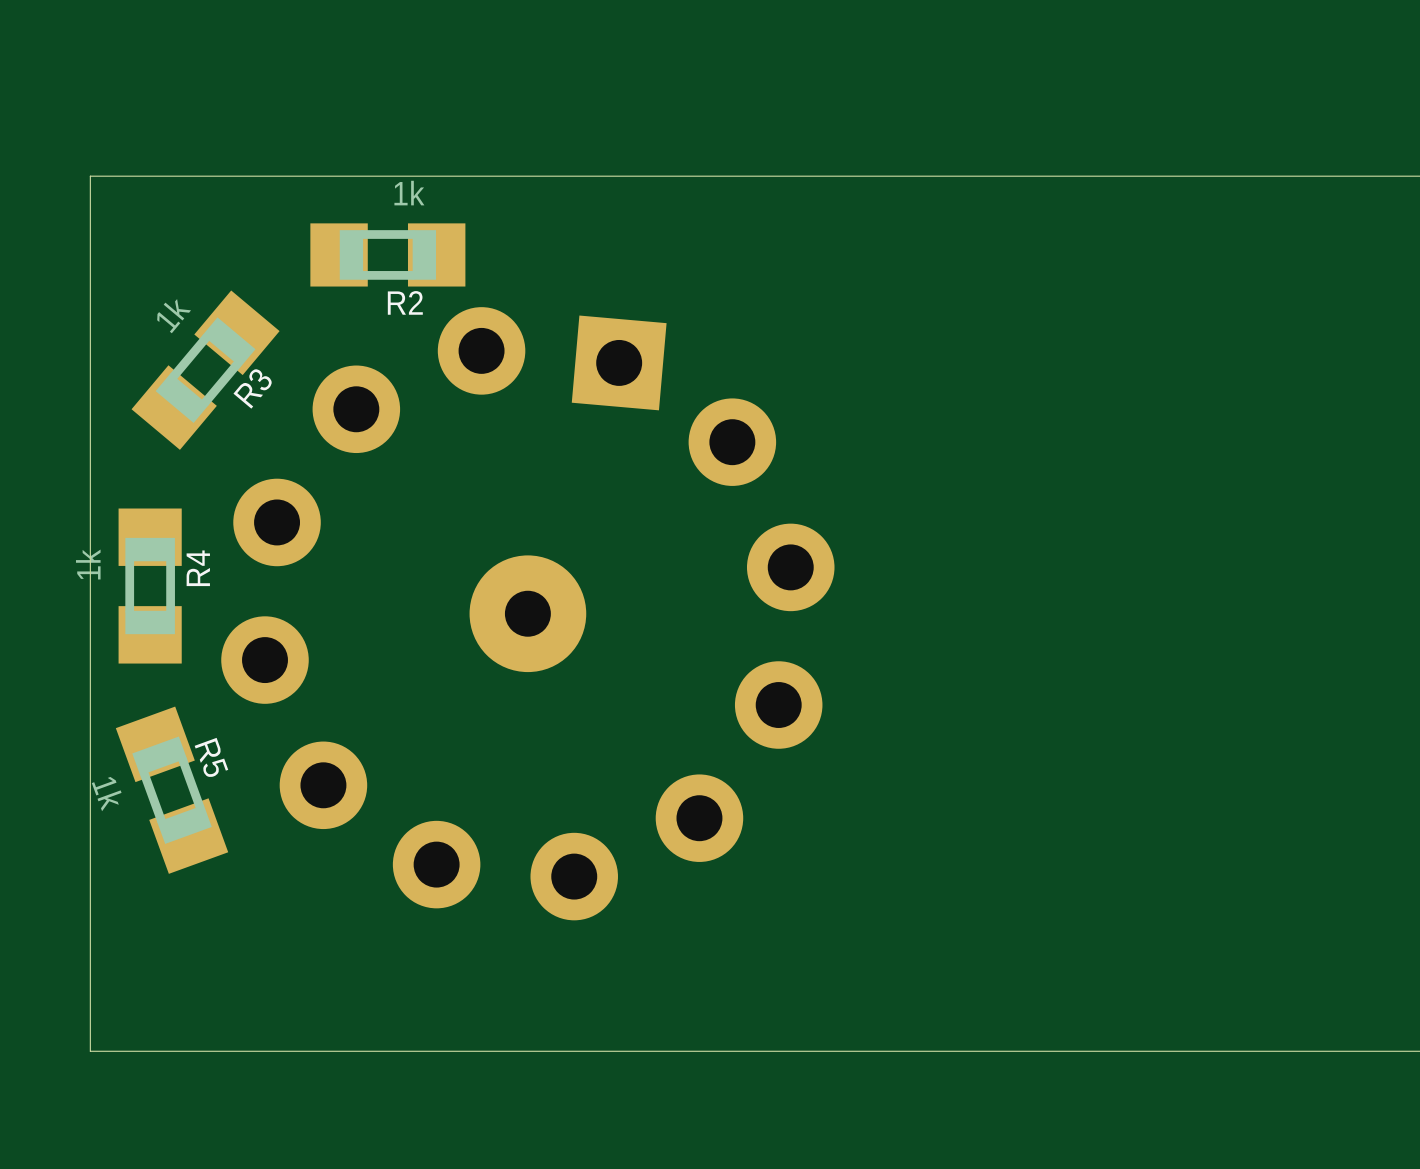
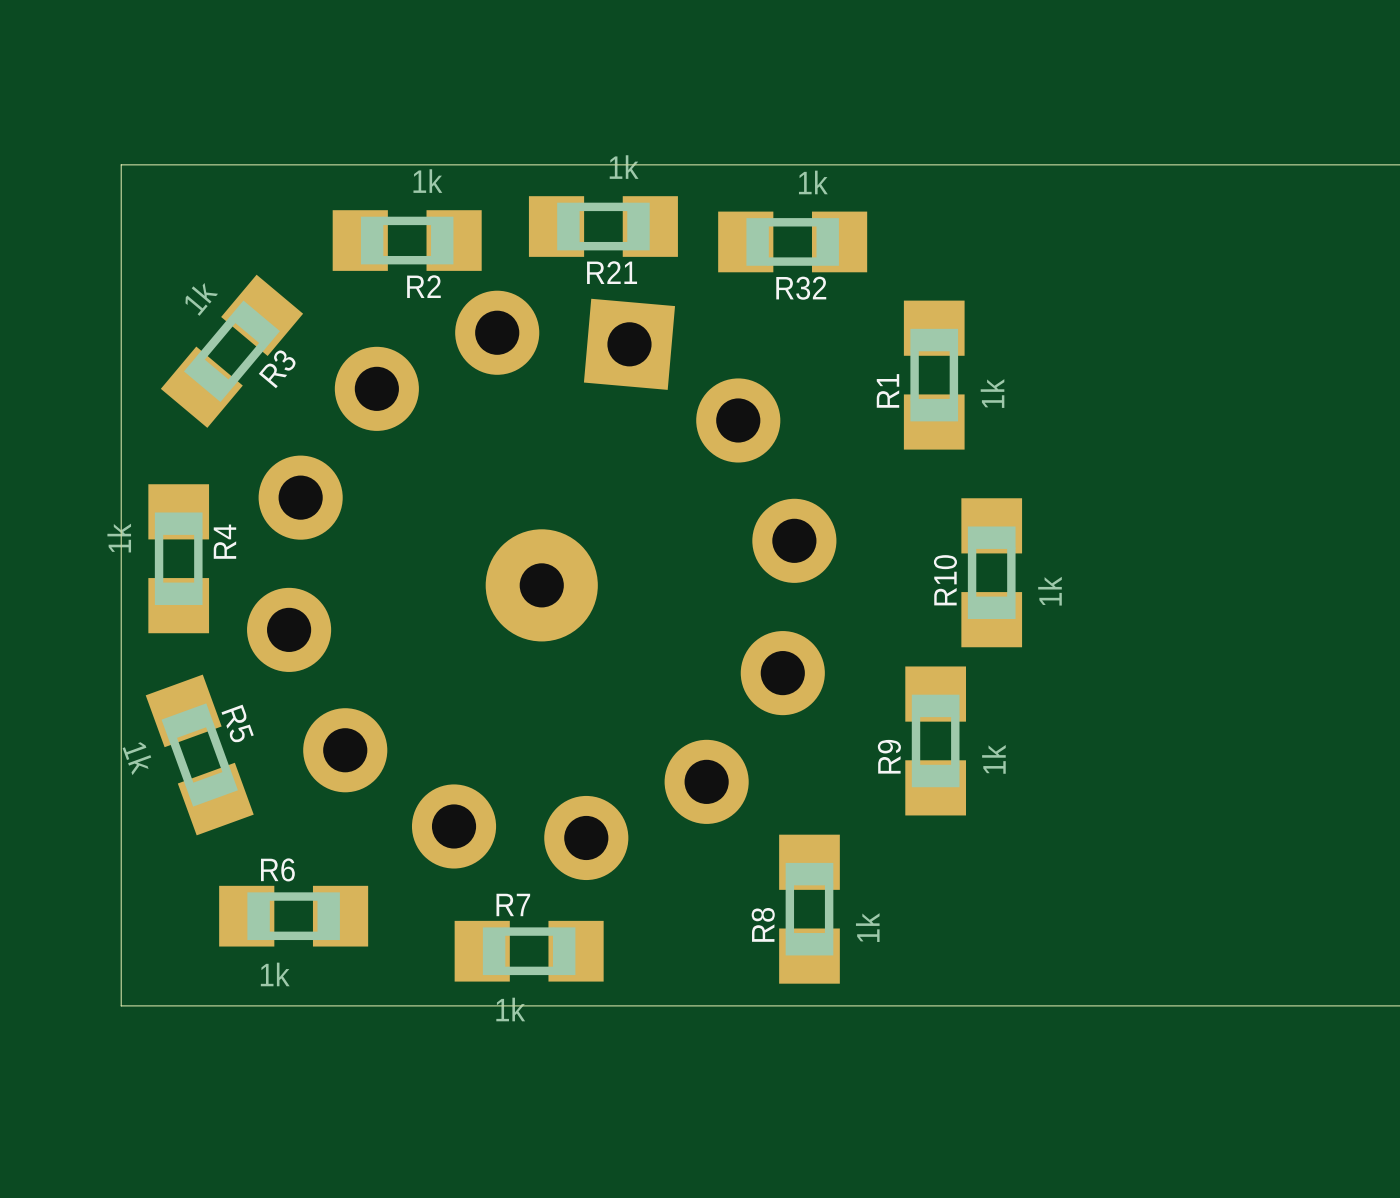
R21: none -> 1k (603, 226)
R32: none -> 1k (792, 241)
R1: none -> 1k (934, 375)
R10: none -> 1k (991, 572)
R9: none -> 1k (935, 740)
R8: none -> 1k (809, 909)
R6: none -> 1k (293, 916)
R7: none -> 1k (529, 951)

